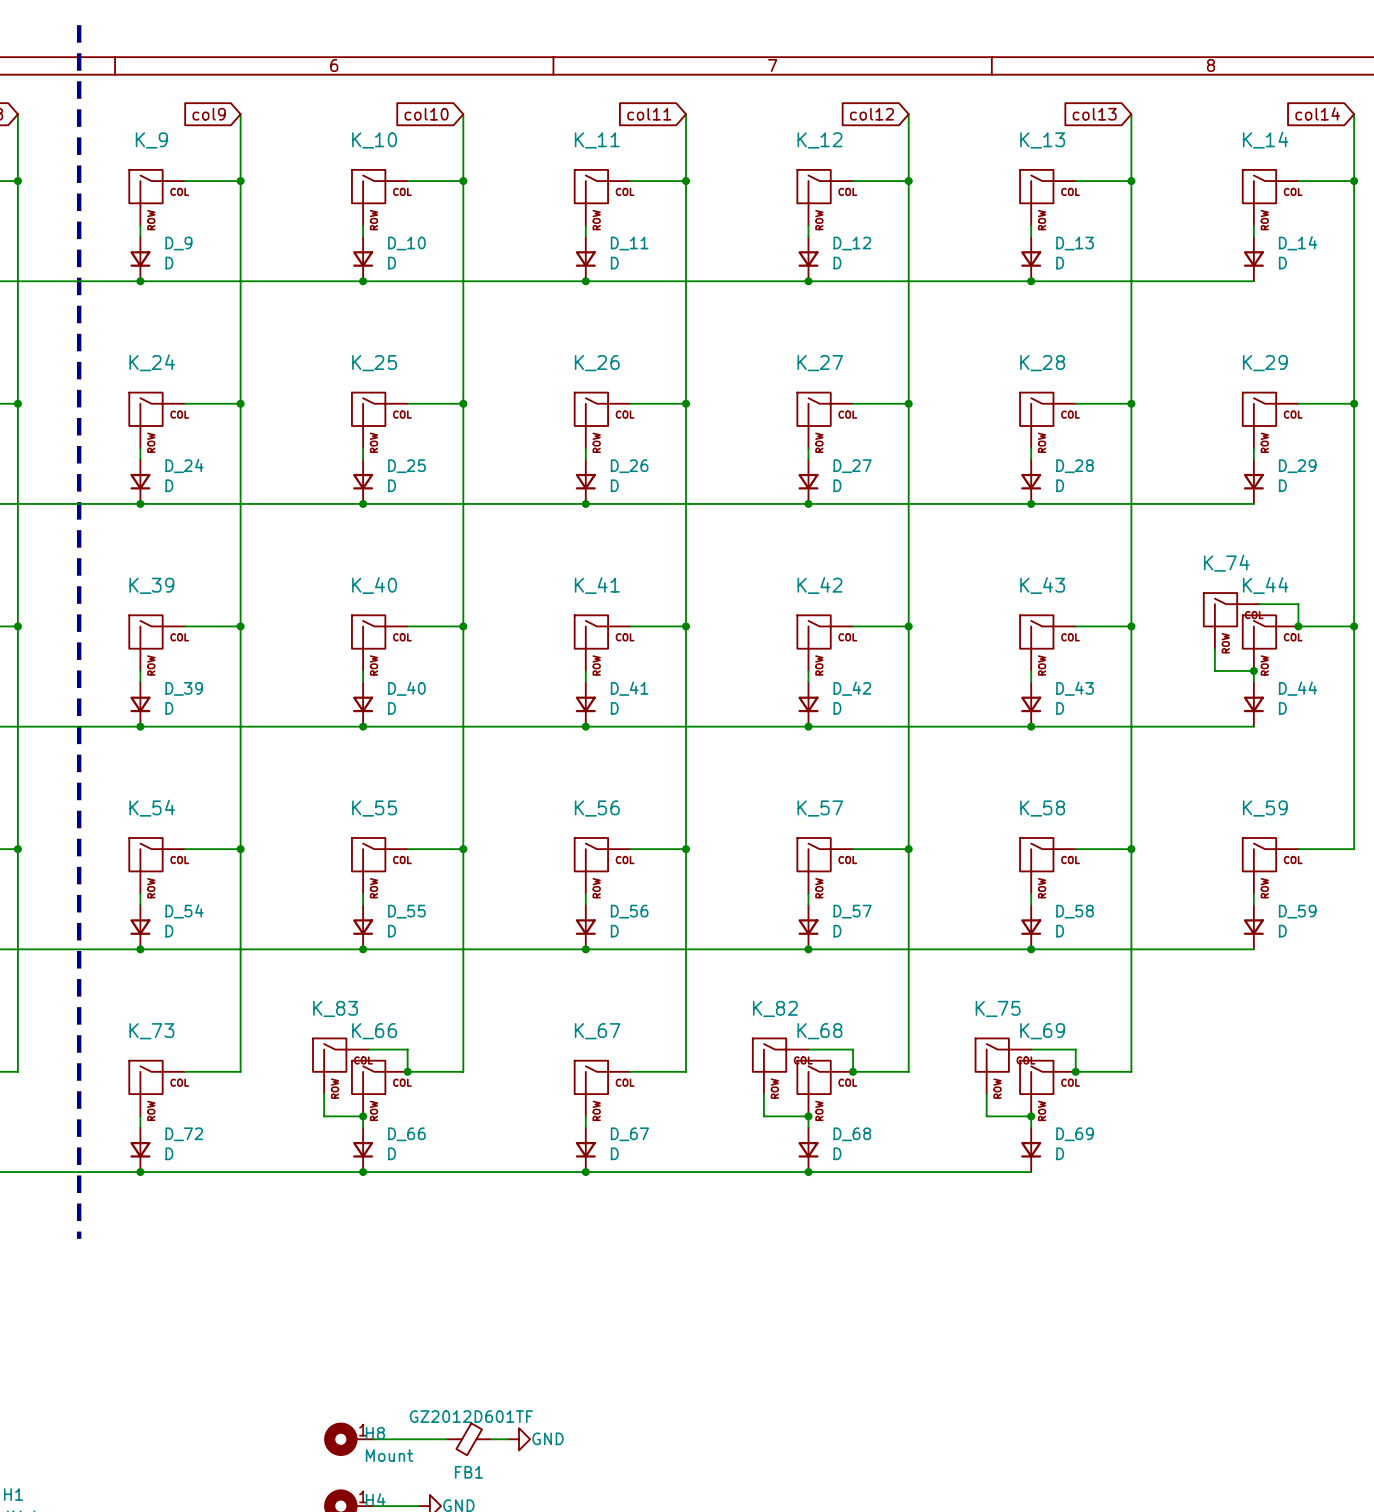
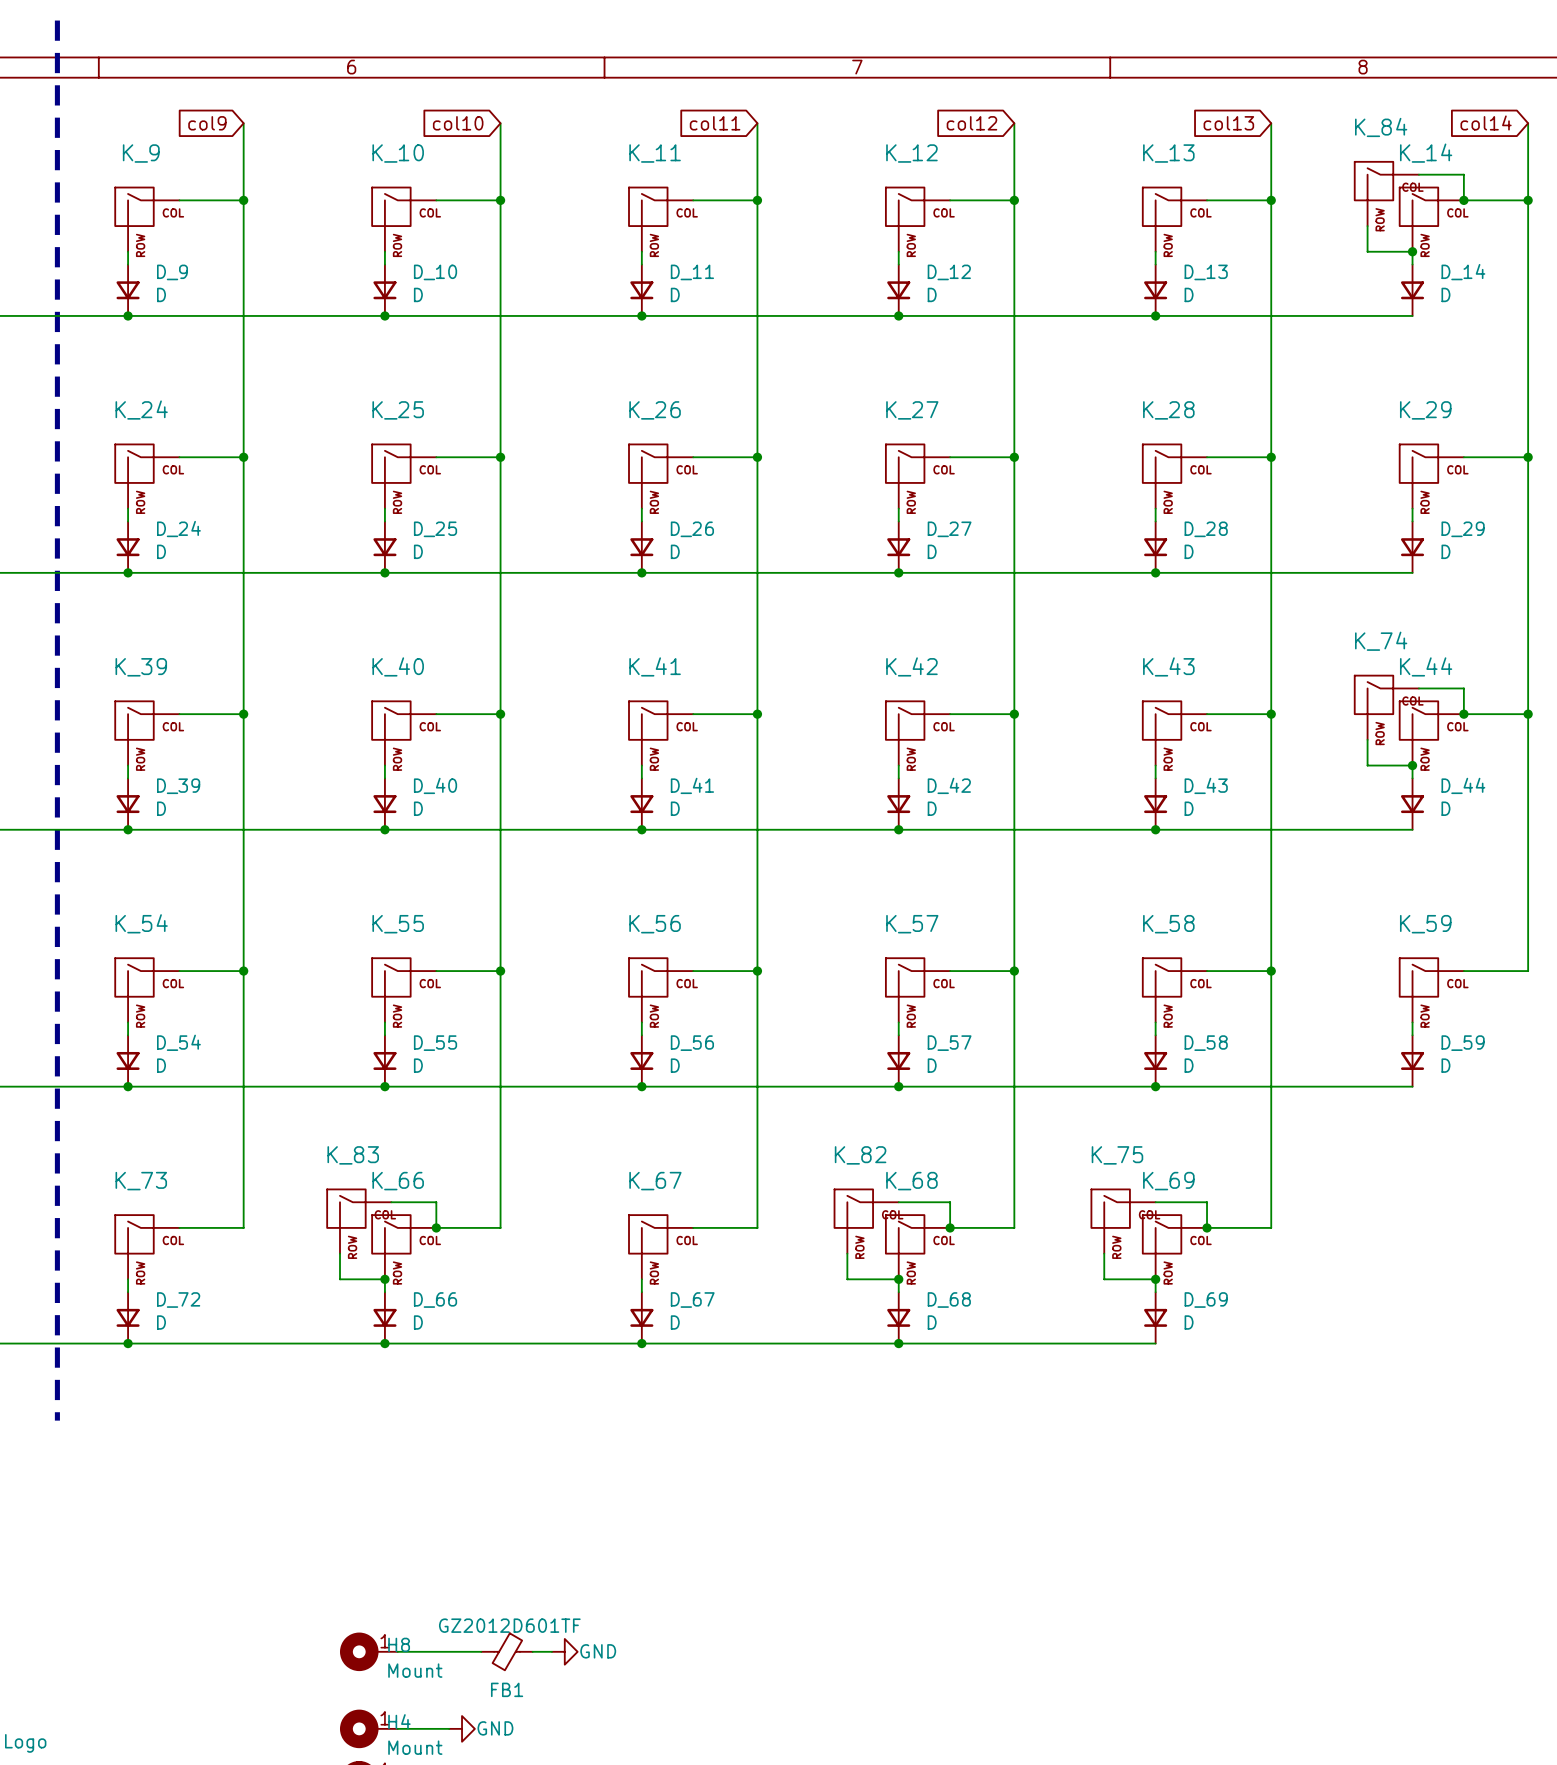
wire: none -> (1418, 174) (1463, 174) (1463, 200)
K_84: none -> (1386, 193)
junction: none -> (1463, 200)
wire: none -> (1367, 226) (1367, 251) (1412, 251)
junction: none -> (1412, 251)

